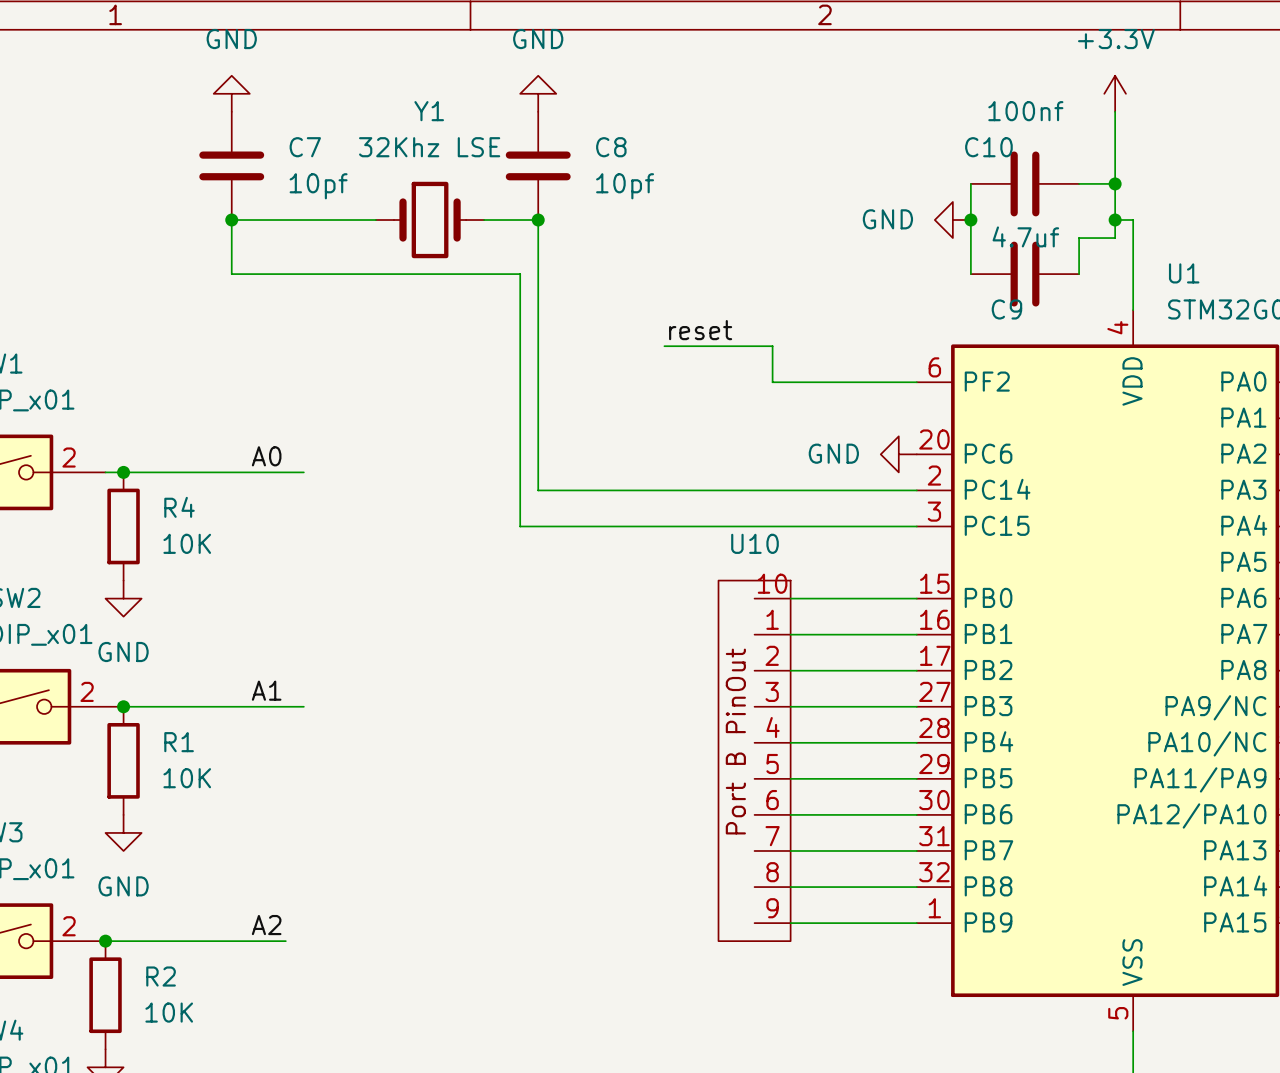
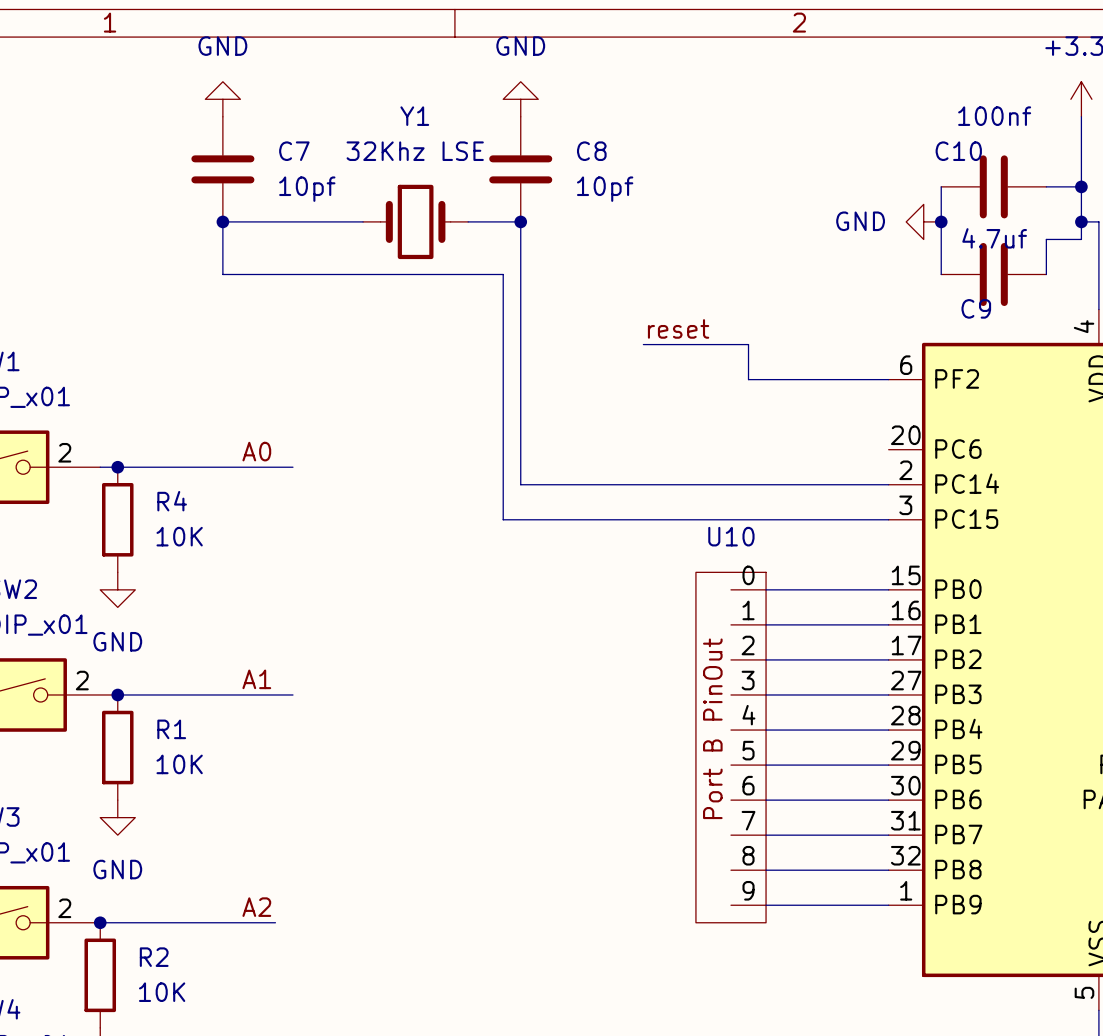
power symbol: GND (898, 454) -> none
U10 pin number: 10 (772, 583) -> 0 (748, 575)

